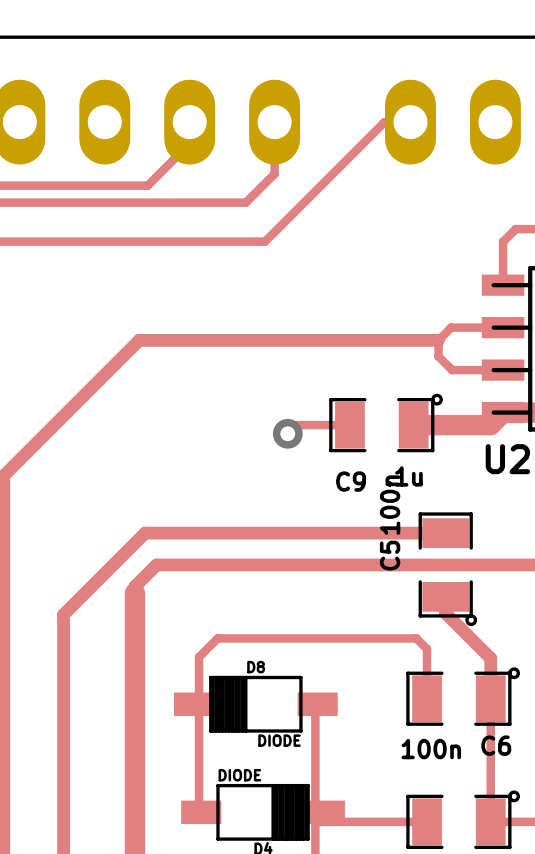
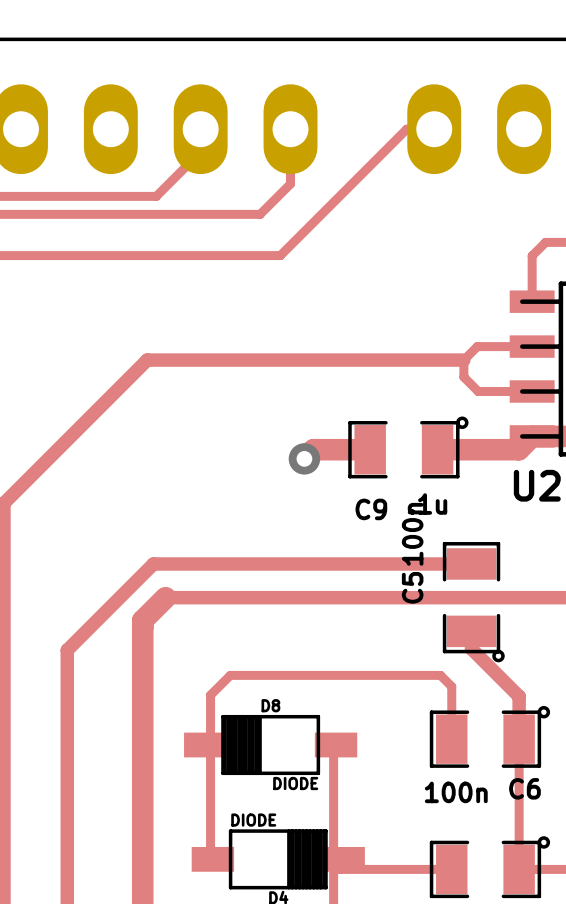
track width: thin (349, 425) (296, 425) (287, 433) -> thick (370, 449) (313, 449) (304, 458)
track width: thin (156, 564) (134, 586) (134, 593) -> thick (165, 597) (142, 620) (142, 627)

